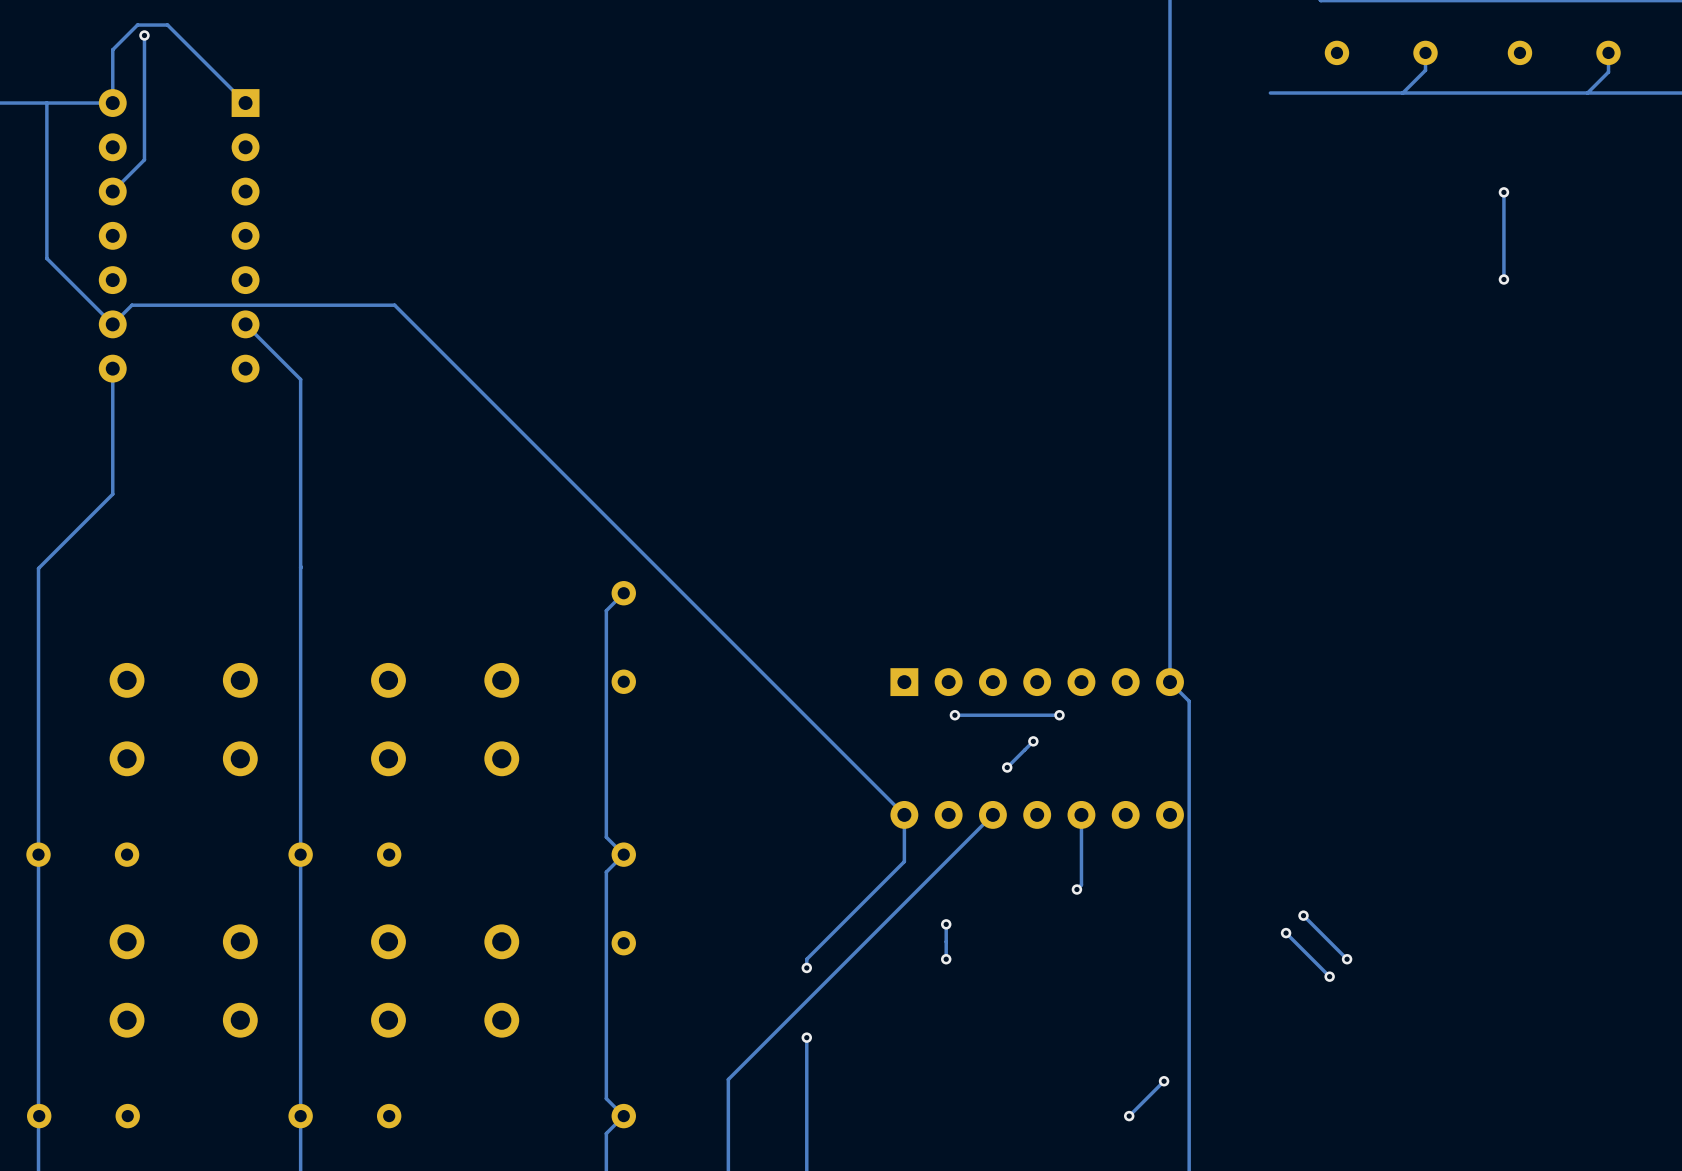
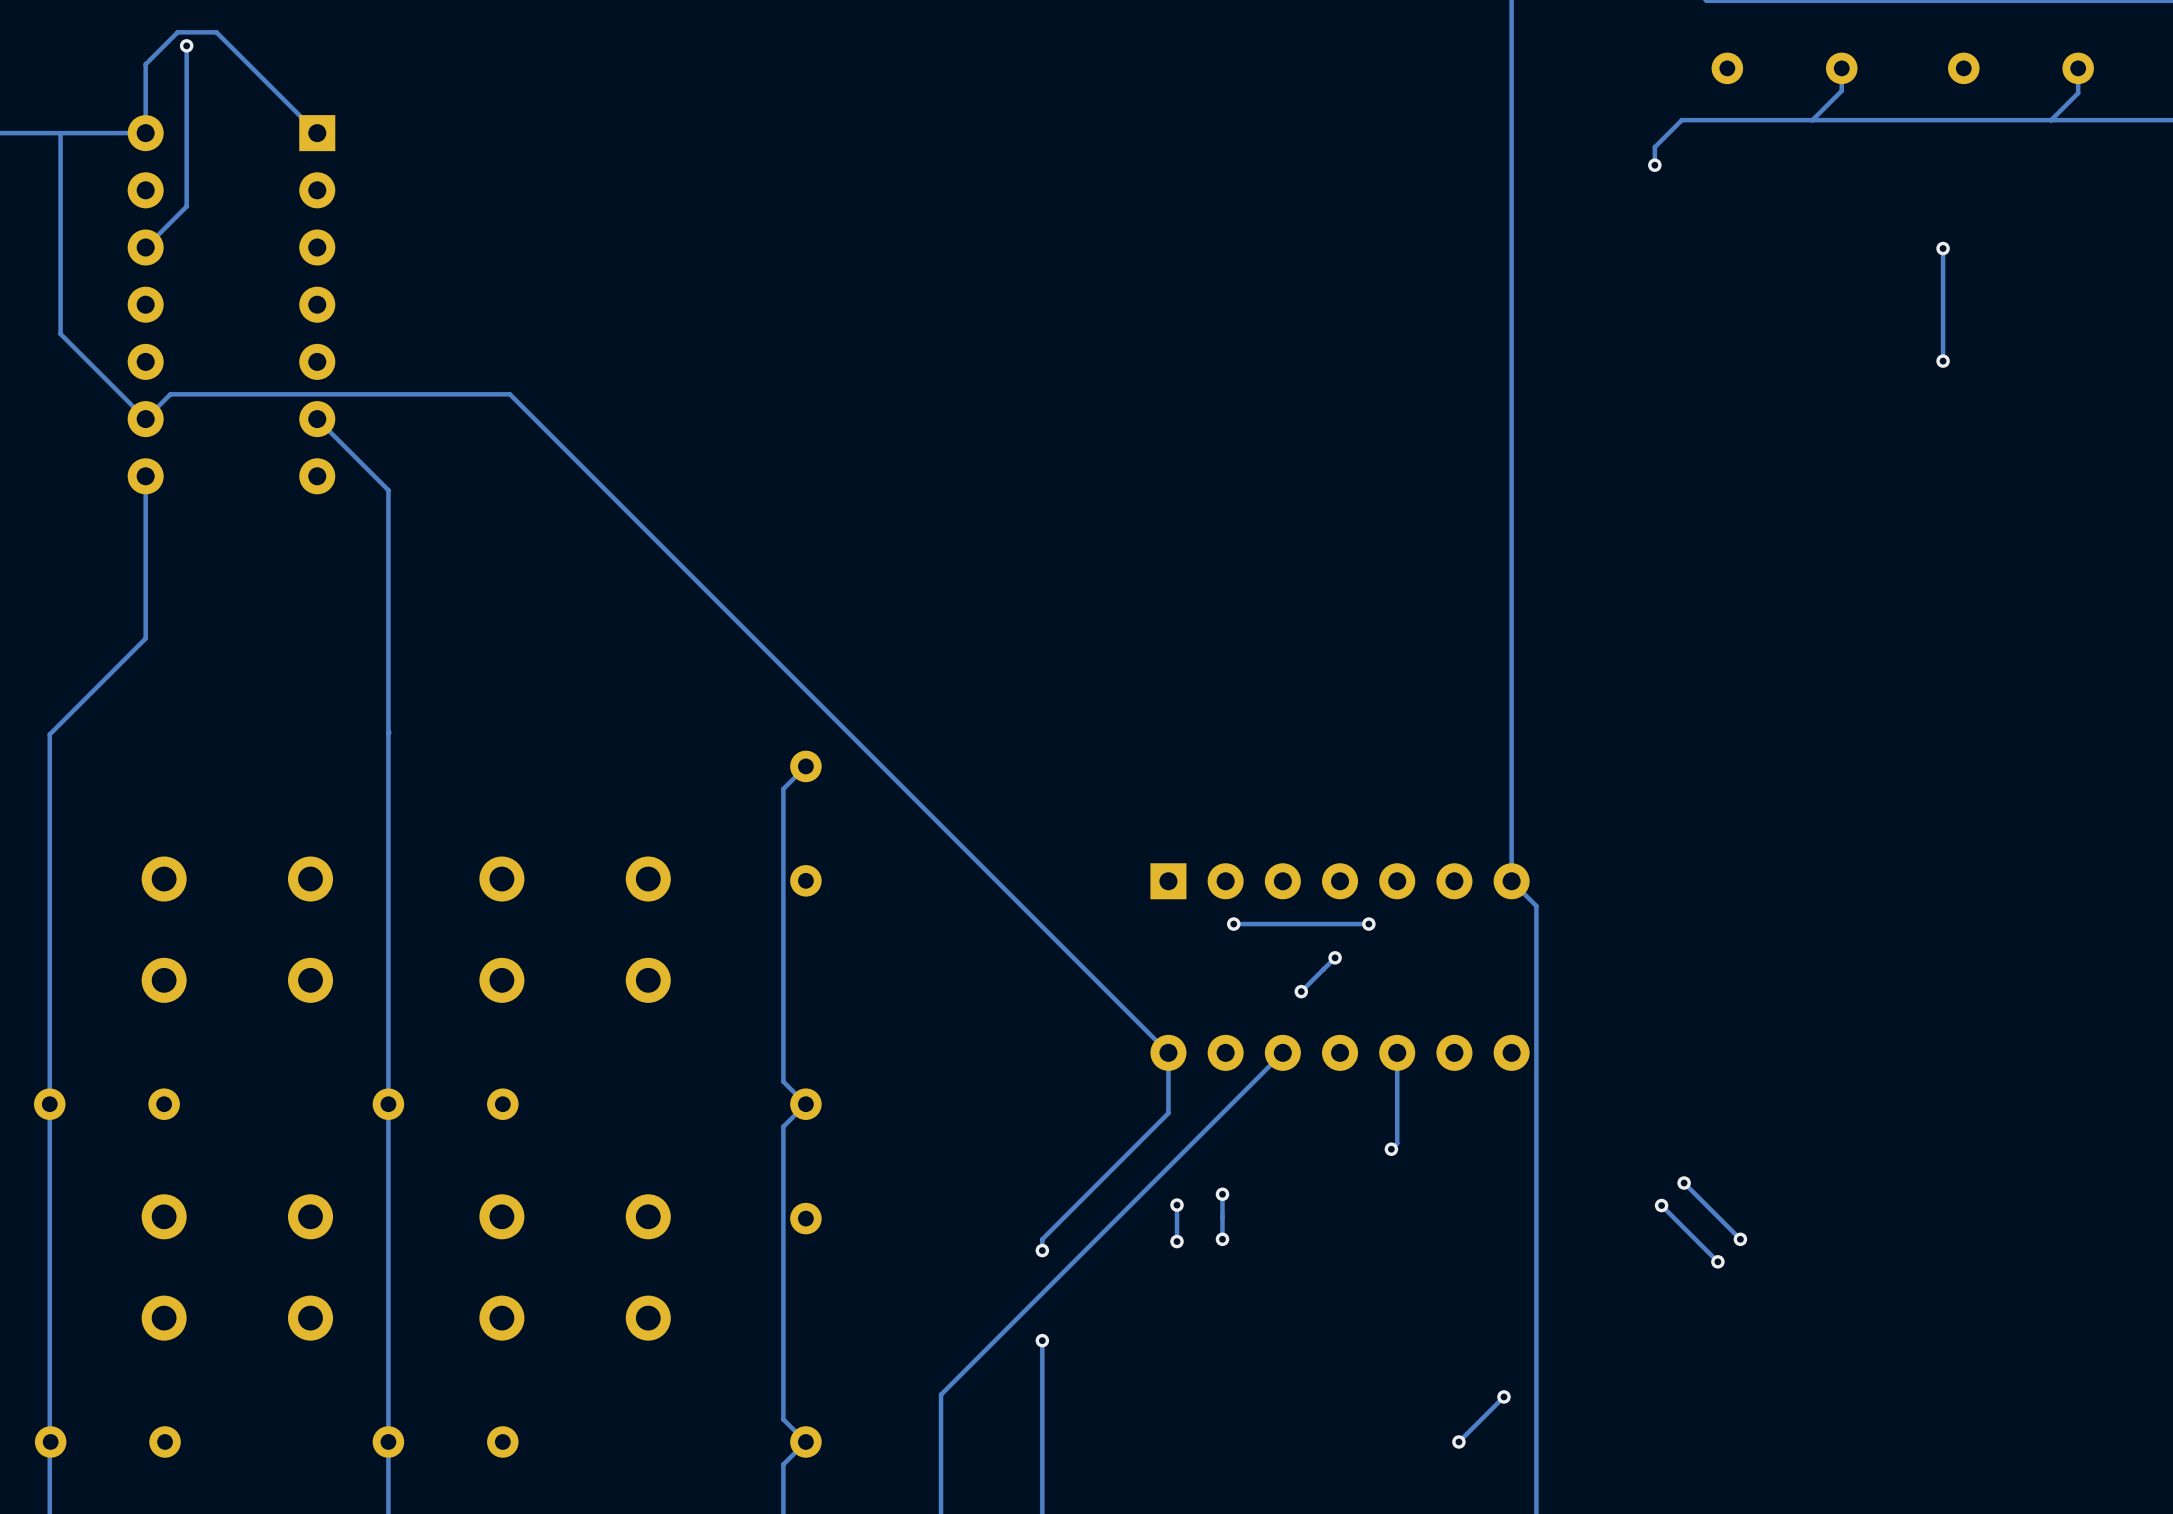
track: (1301, 93) (1270, 93) -> (1681, 120) (1654, 147) (1654, 165)
via: none -> (1654, 165)
track: none -> (1177, 1205) (1177, 1241)
via: none -> (1177, 1205)
via: none -> (1177, 1241)

